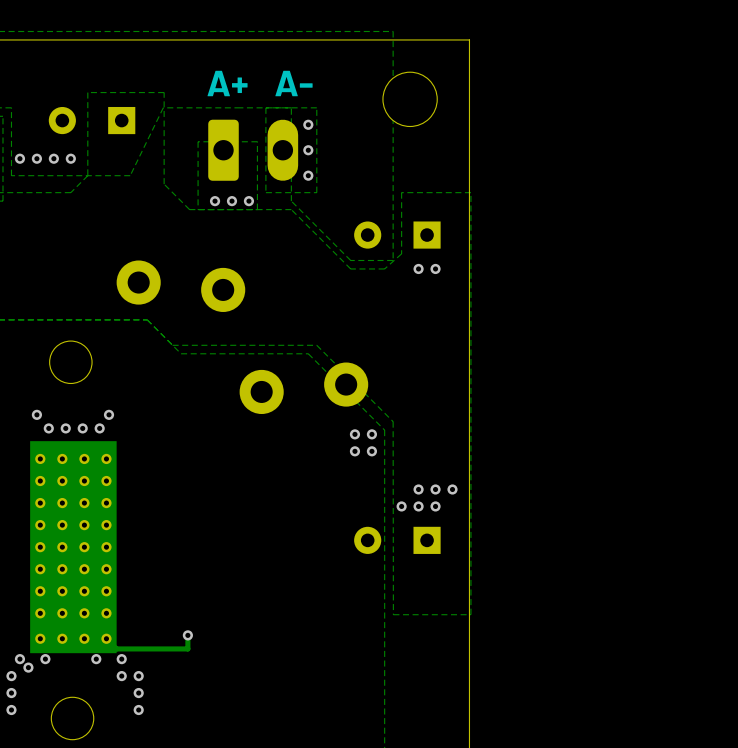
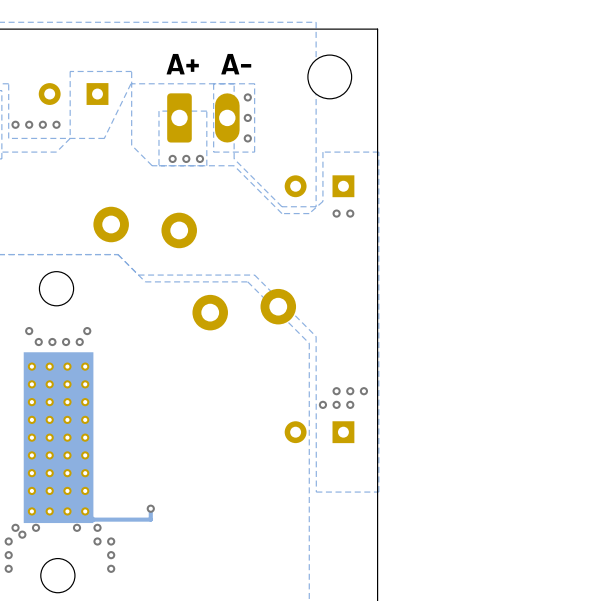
via: (354, 434) -> none
via: (371, 434) -> none
via: (354, 451) -> none
via: (371, 451) -> none

